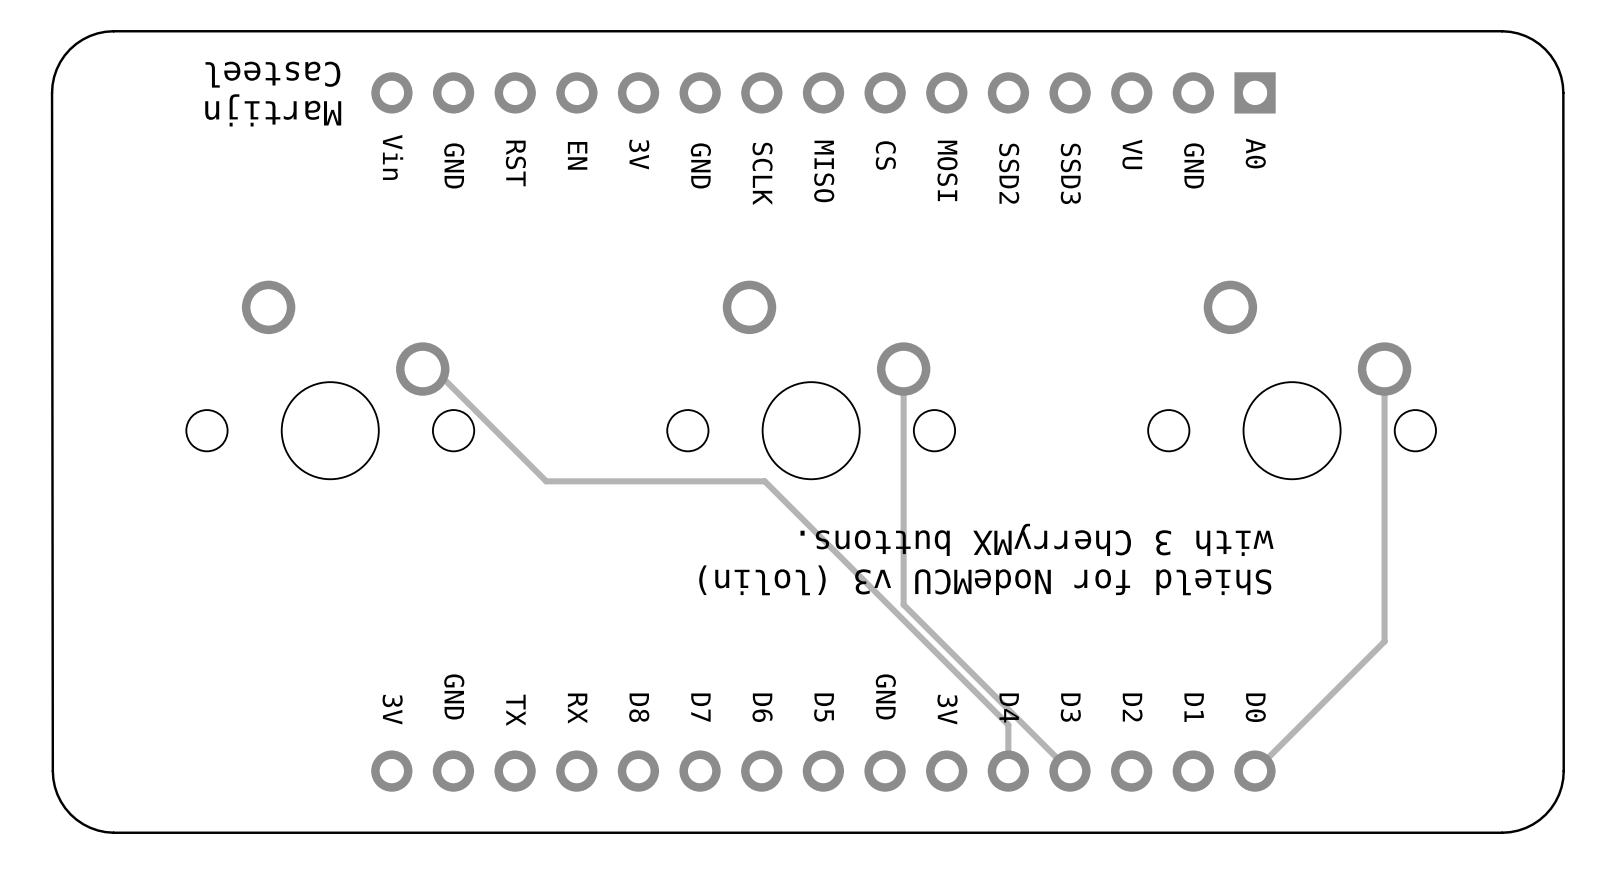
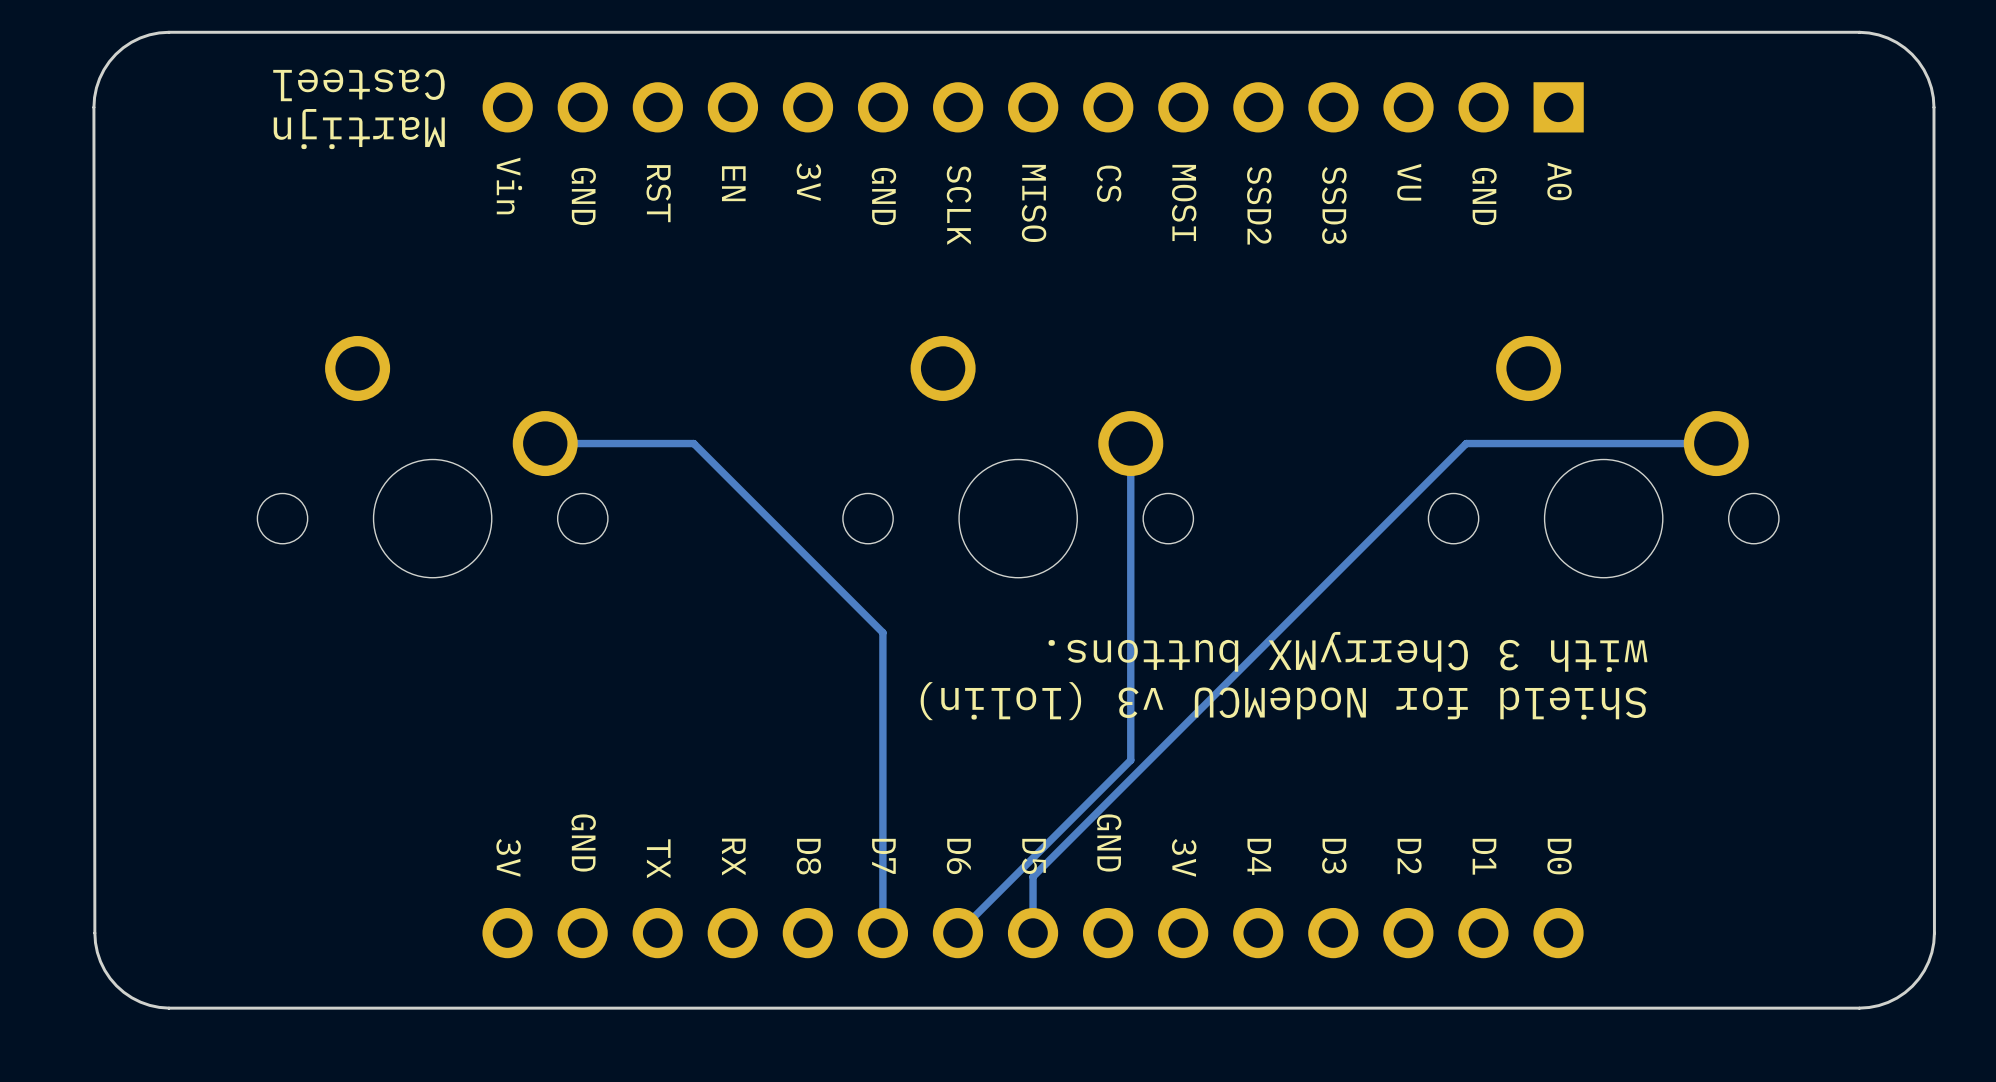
track: (433, 369) (546, 481) (764, 481) (1008, 724) (1008, 771) -> (558, 443) (693, 443) (882, 632) (882, 933)
track: (1384, 369) (1384, 641) (1254, 771) -> (1716, 443) (1466, 443) (1033, 876) (1033, 933)
text position: with 3 CherryMX buttons. (1037, 539) -> with 3 CherryMX buttons. (1348, 651)
text position: Shield for NodeMCU v3 (lolin) (985, 580) -> Shield for NodeMCU v3 (lolin) (1283, 701)
track: (903, 604) (1069, 771) -> (1130, 730) (1130, 760) (957, 933)

